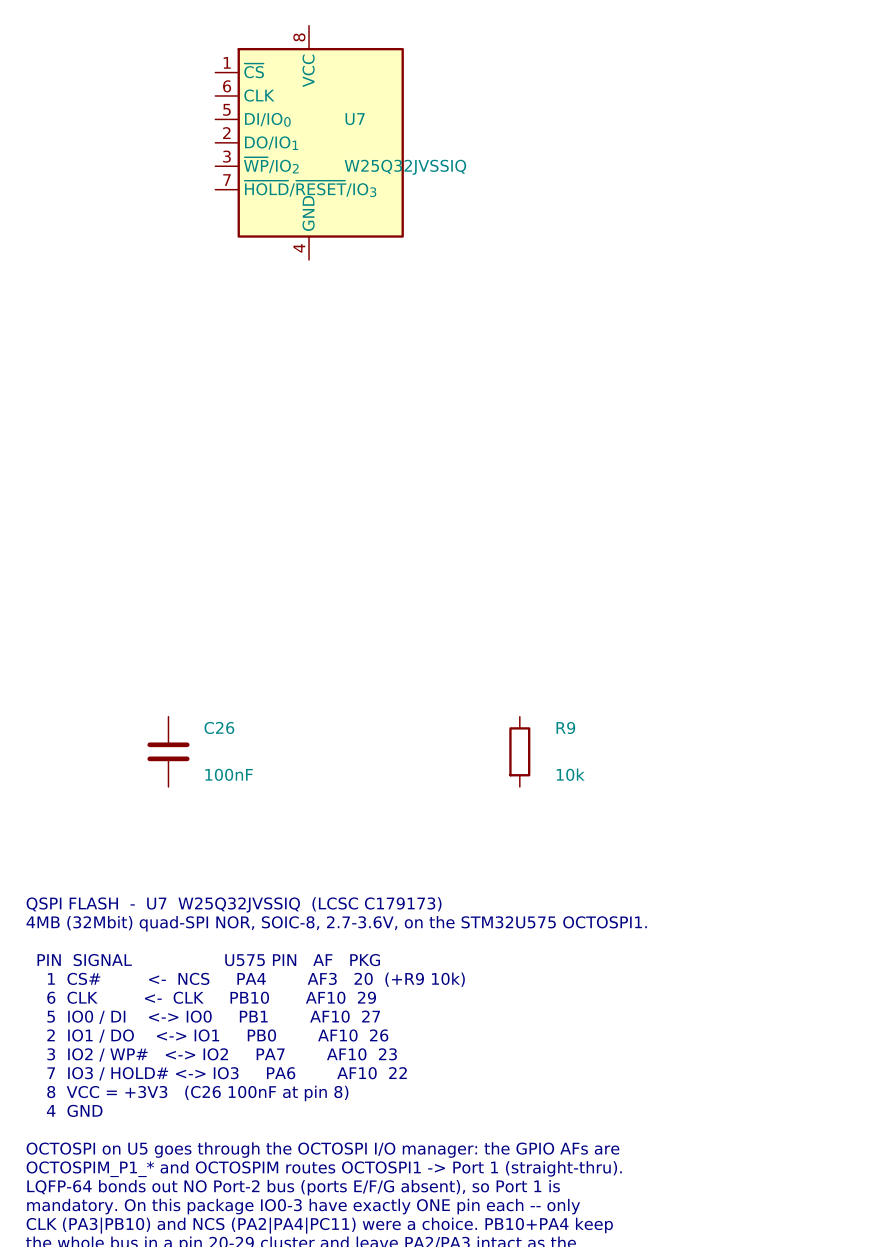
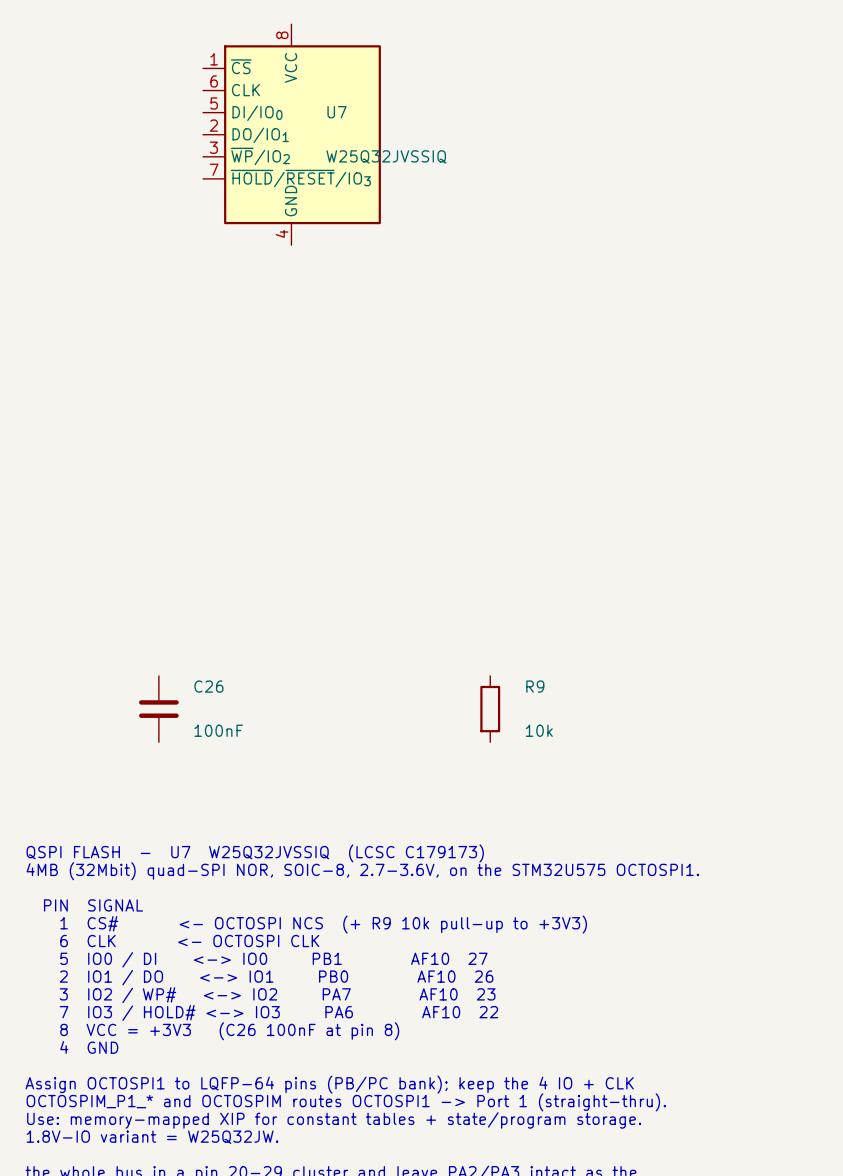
text: PIN SIGNAL U575 PIN AF PKG (208, 960) -> PIN SIGNAL (93, 905)
text: 1 CS# <- NCS PA4 AF3 20 (+R9 10k) (256, 979) -> 1 CS# <- OCTOSPI NCS (+ R9 10k pull-up to +3V3) (323, 924)
text: 6 CLK <- CLK PB10 AF10 29 (211, 997) -> 6 CLK <- OCTOSPI CLK (189, 941)
text: OCTOSPI on U5 goes through the OCTOSPI I/O manager: the GPIO AFs are (322, 1150) -> Assign OCTOSPI1 to LQFP-64 pins (PB/PC bank); keep the 4 IO + CLK (329, 1084)
text: LQFP-64 bonds out NO Port-2 bus (ports E/F/G absent), so Port 1 is (293, 1187) -> Use: memory-mapped XIP for constant tables + state/program storage. (334, 1120)
text: mandatory. On this package IO0-3 have exactly ONE pin each -- only (303, 1206) -> 1.8V-IO variant = W25Q32JW. (152, 1137)
text: CLK (PA3|PB10) and NCS (PA2|PA4|PC11) were a choice. PB10+PA4 keep (319, 1225) -> none

